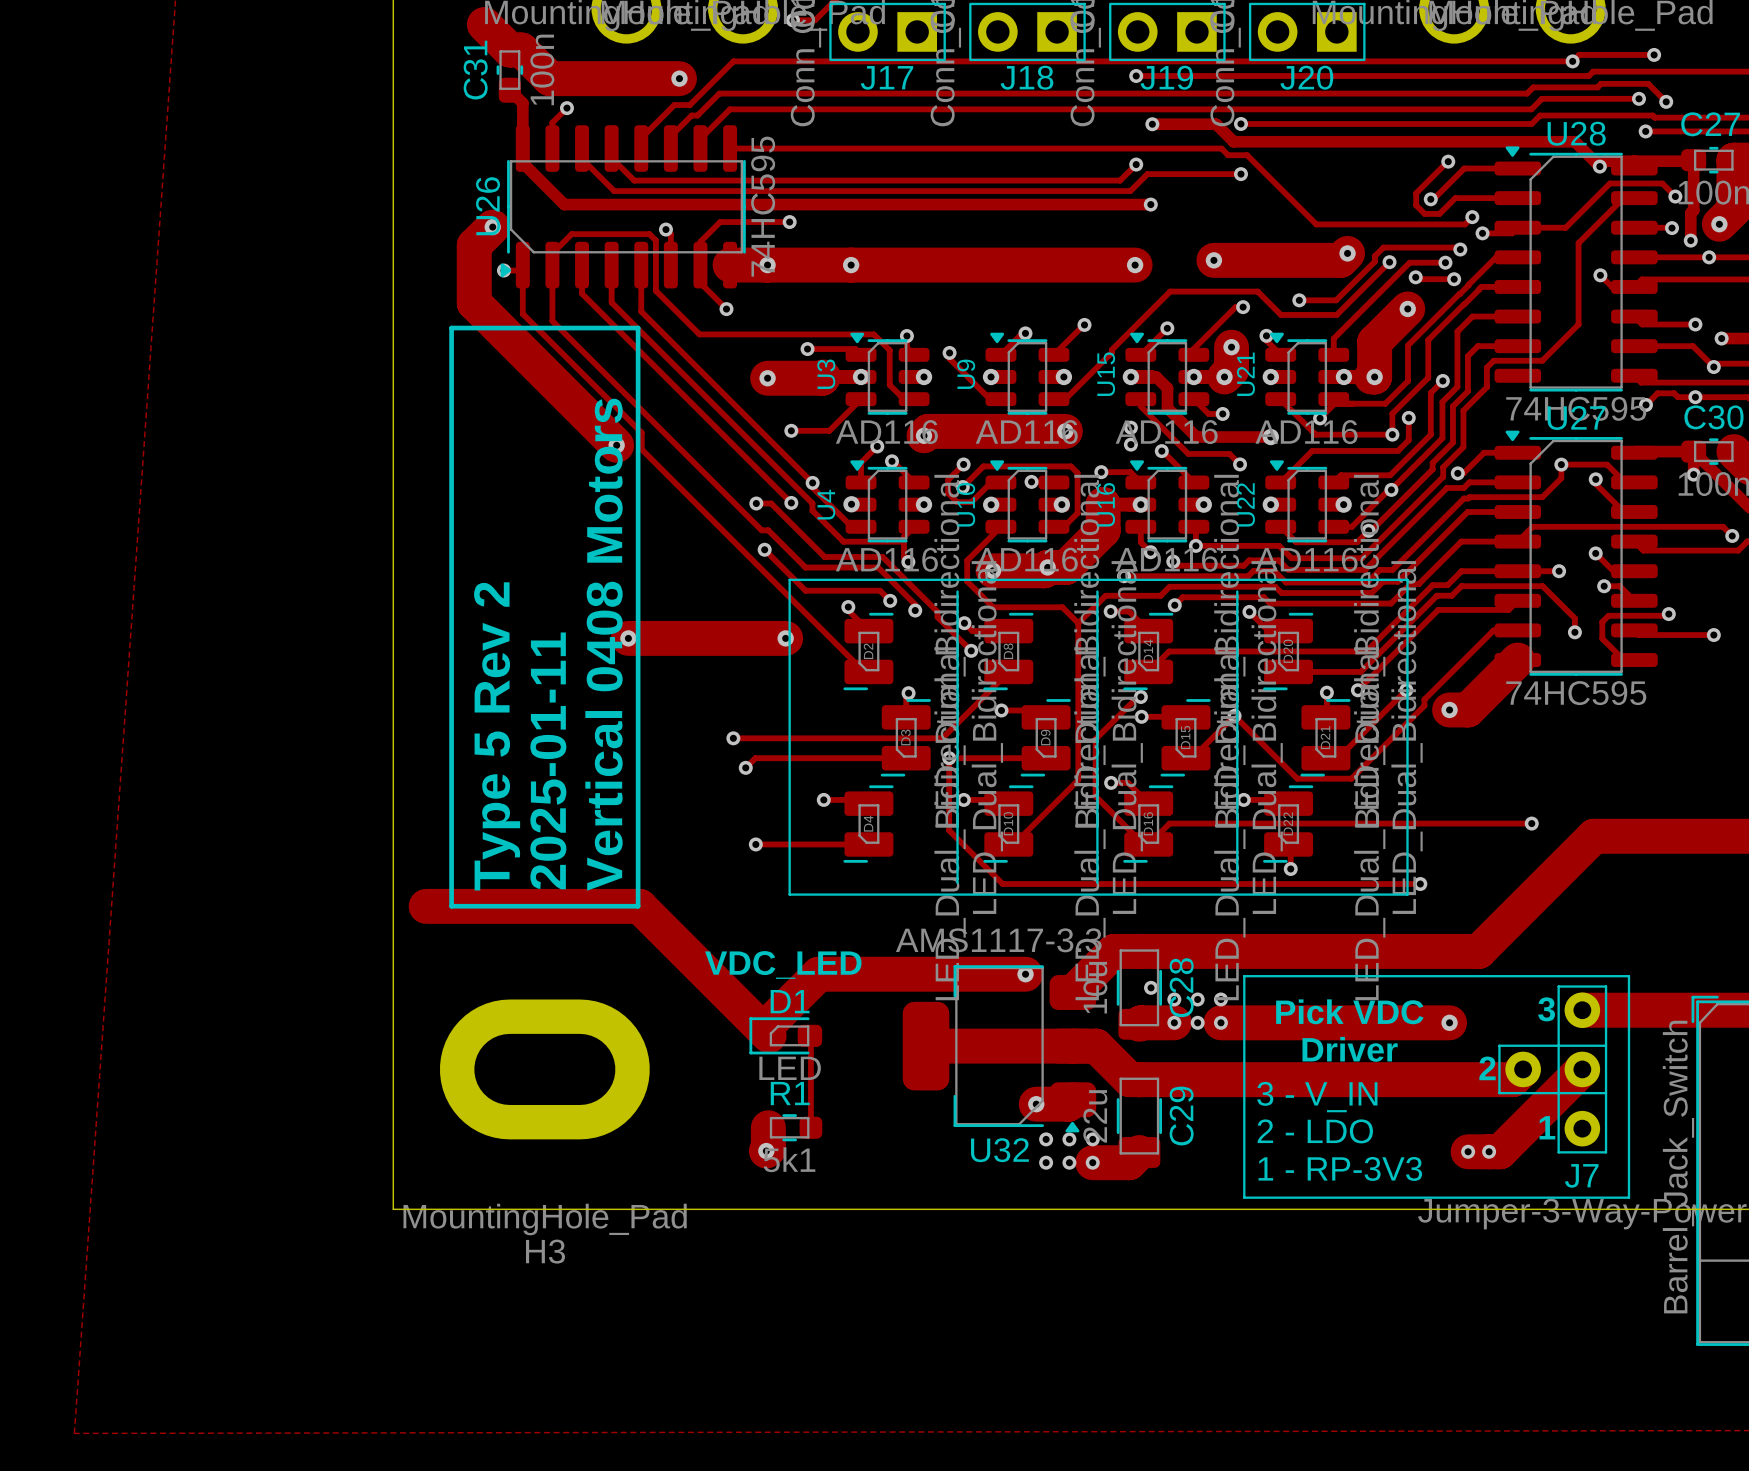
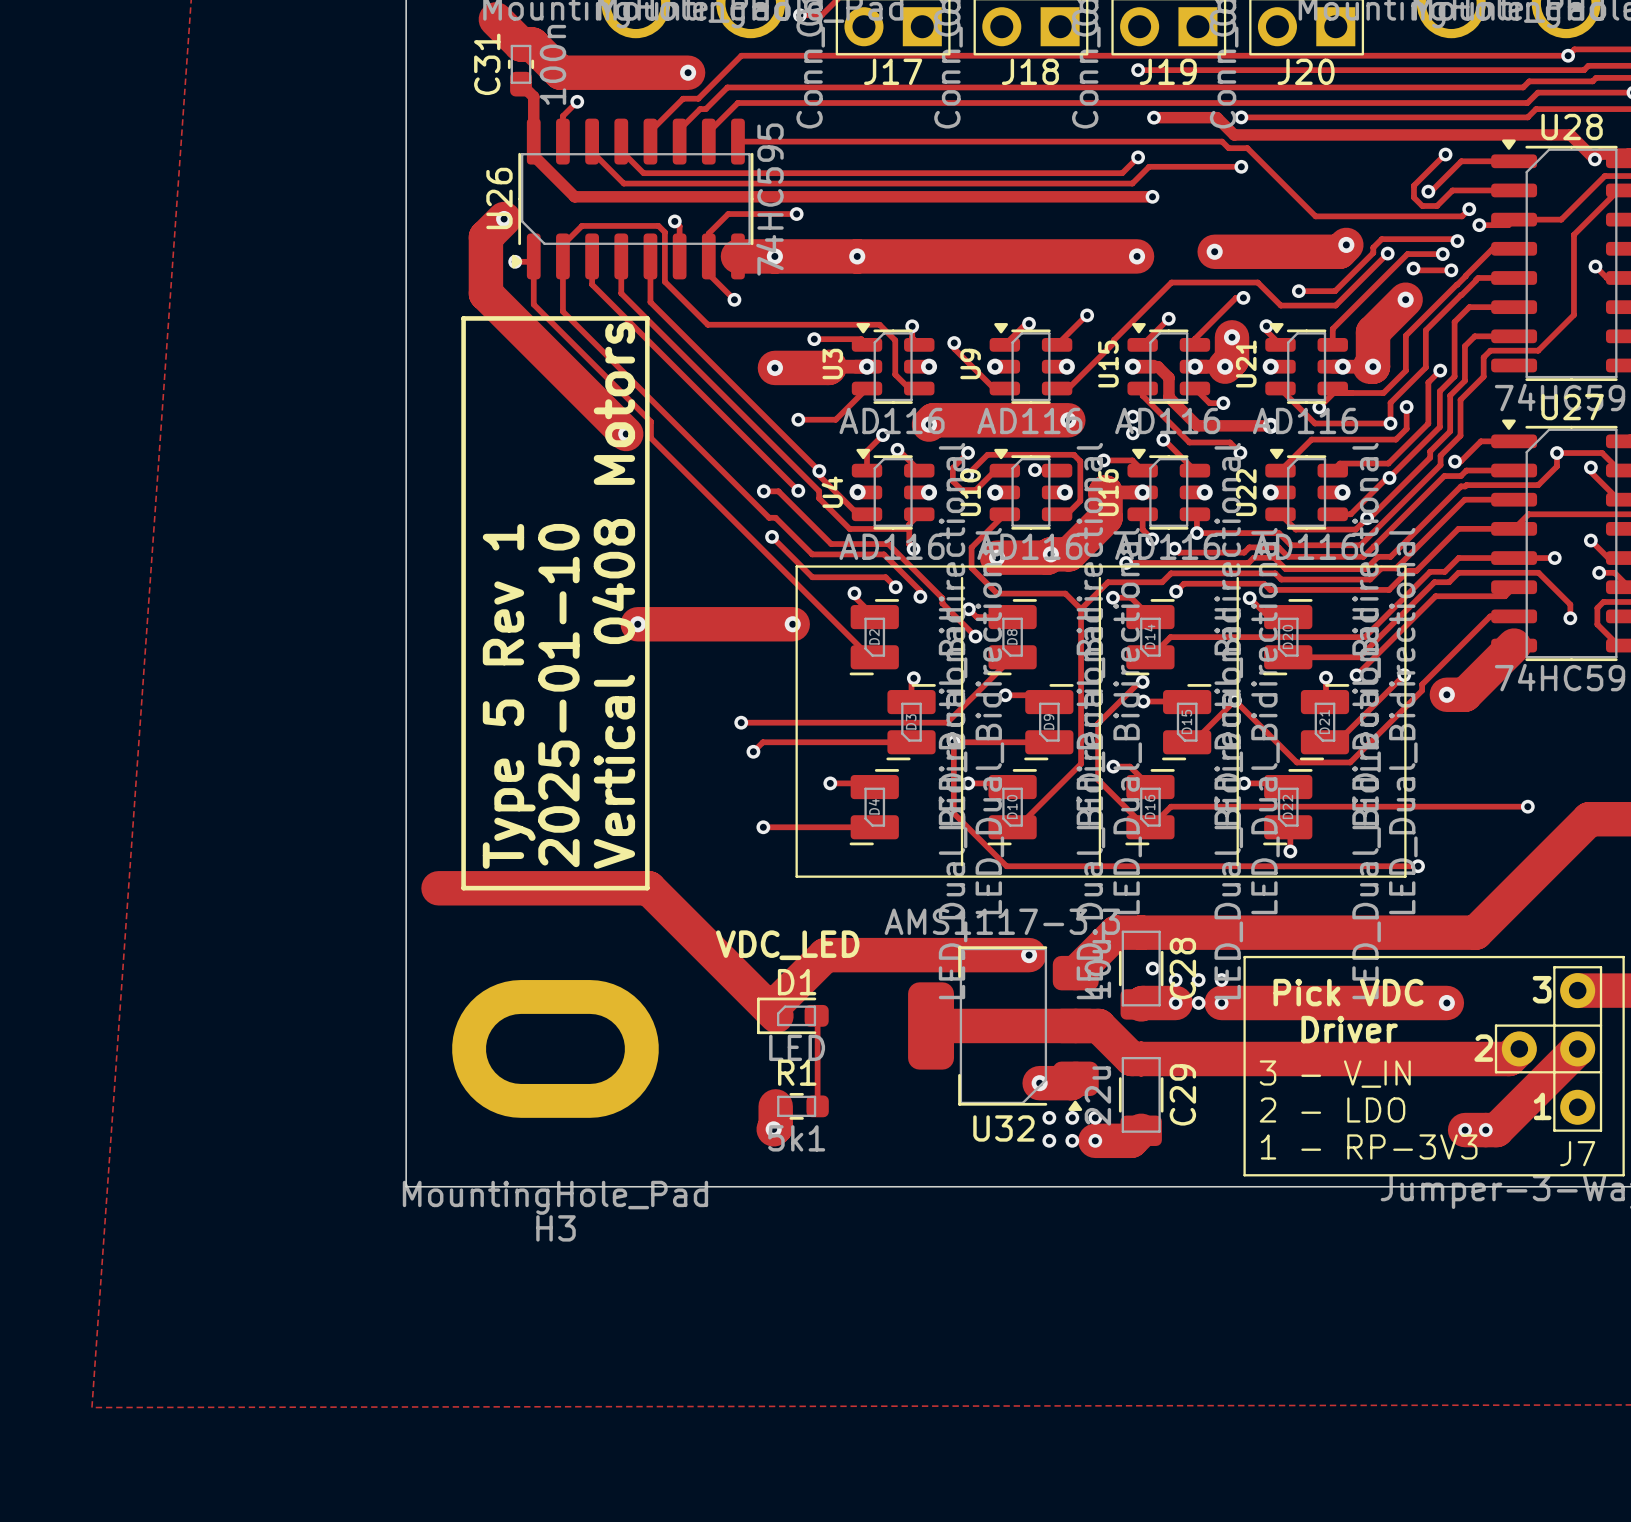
text: Type 5 Rev 2 (497, 736) -> Type 5 Rev 1 (509, 696)
text: 2025-01-11 (548, 760) -> 2025-01-10 (558, 695)

